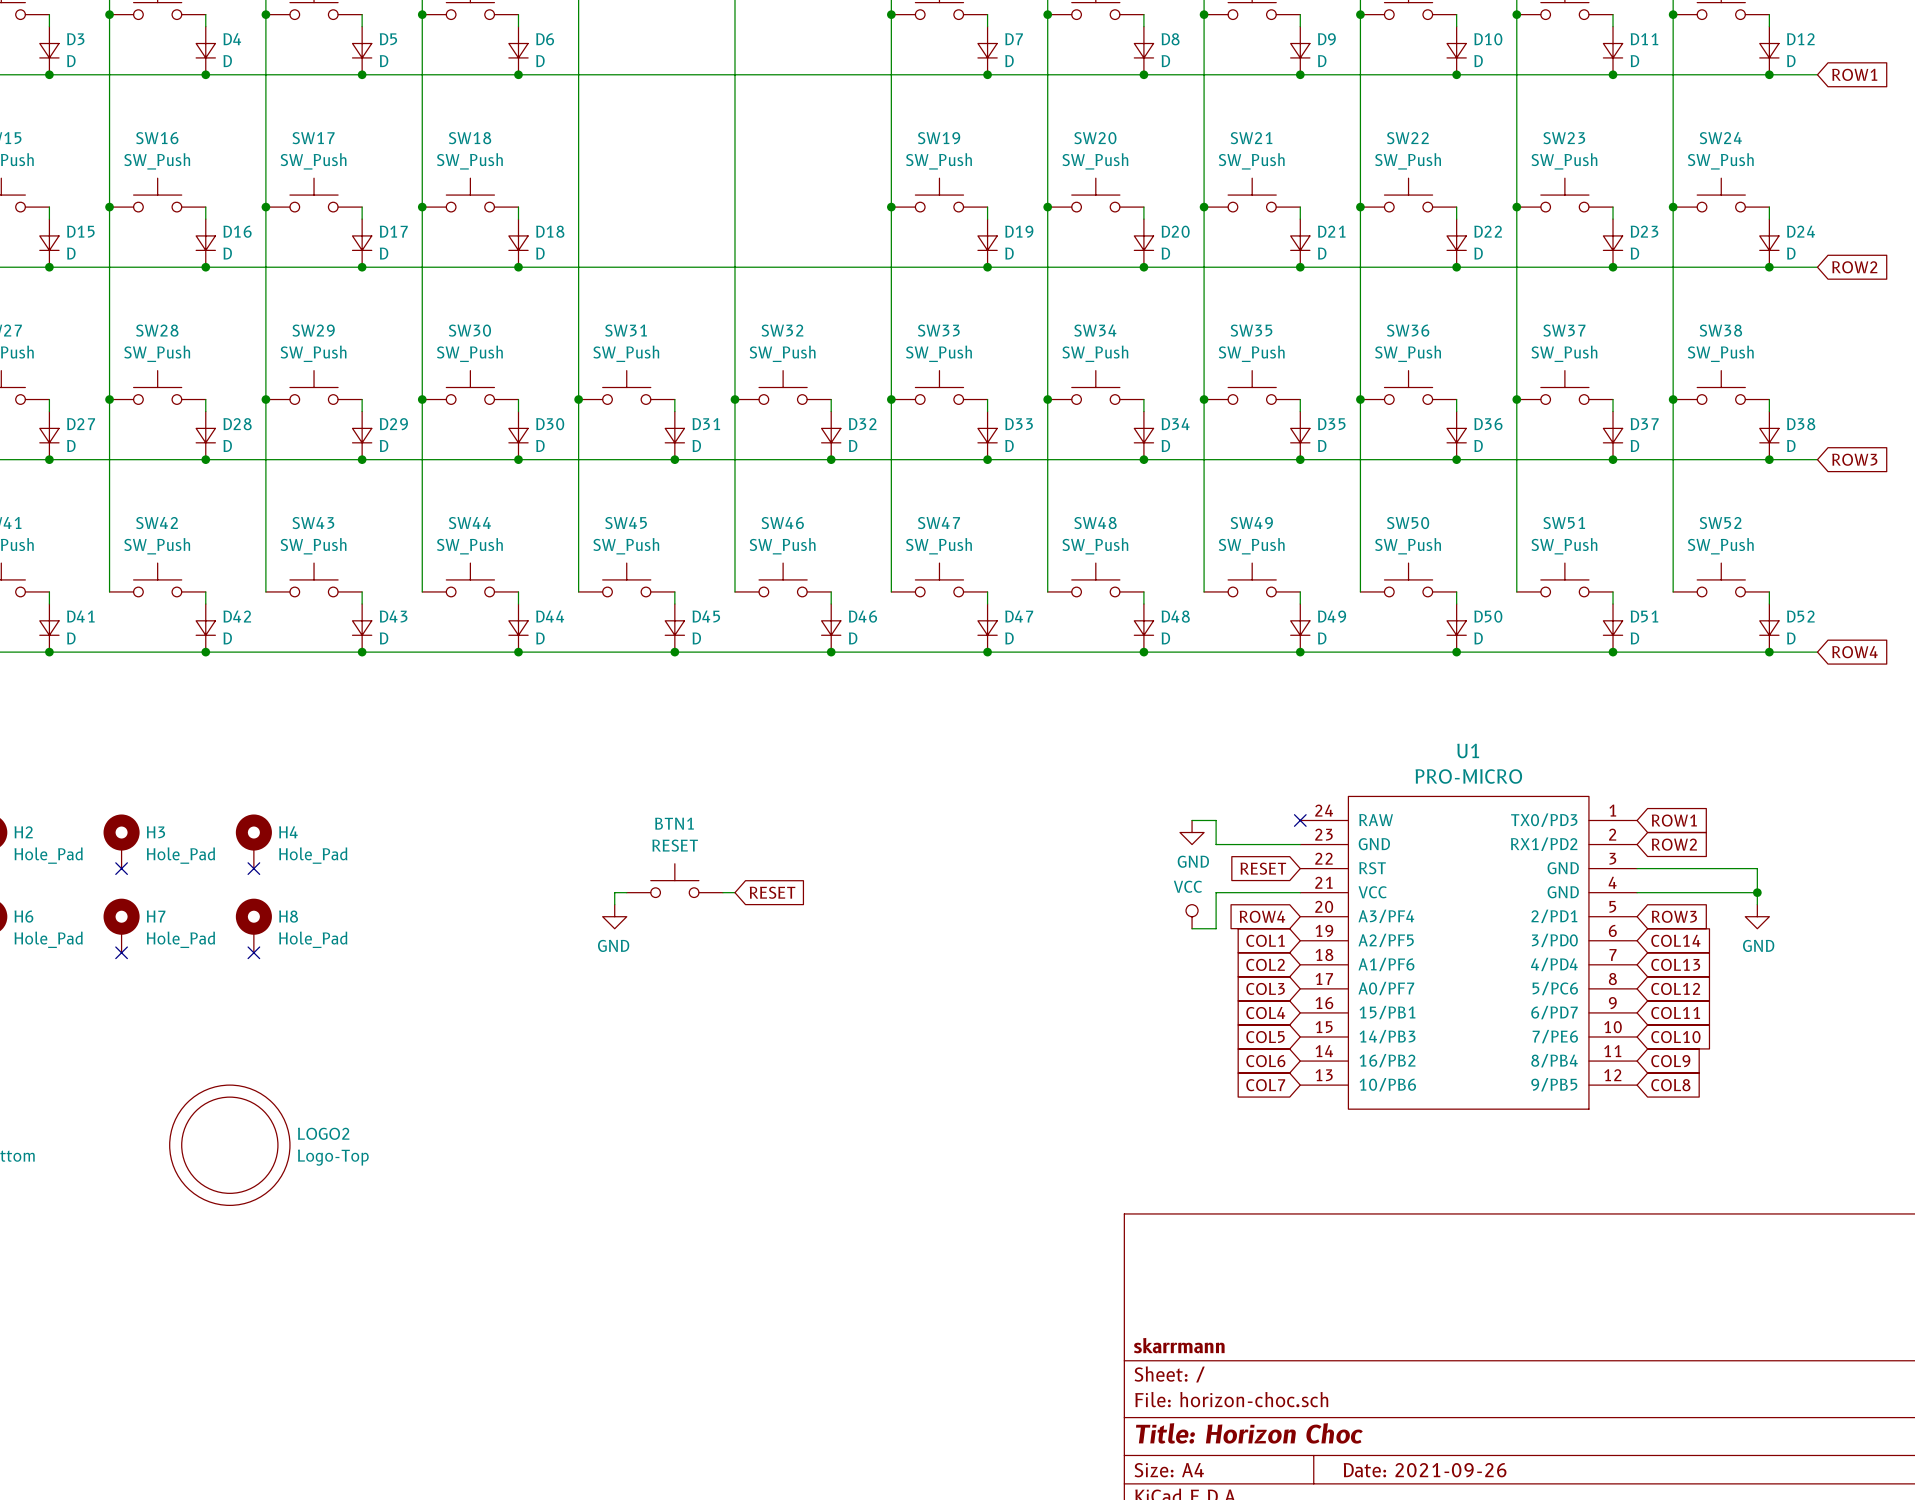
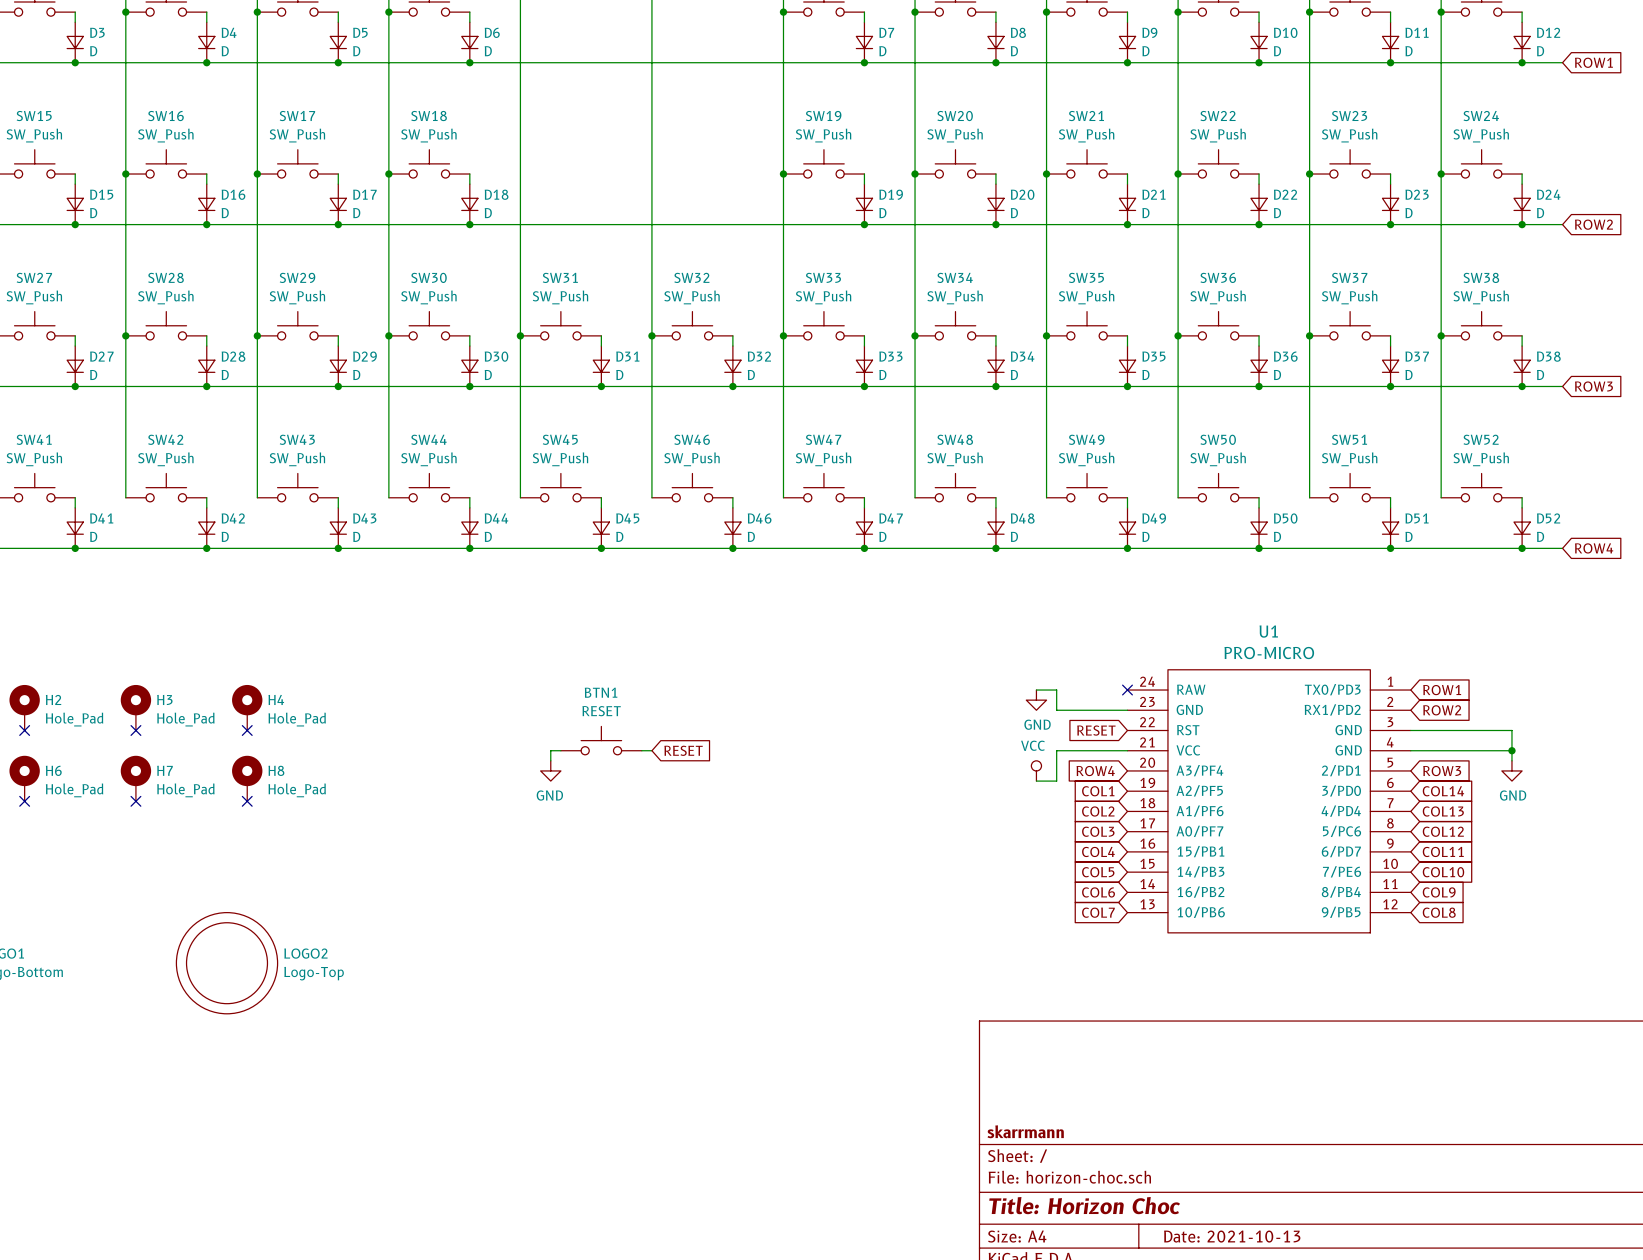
title block: Date: 2021-09-26 (1425, 1470) -> Date: 2021-10-13 (1232, 1236)

